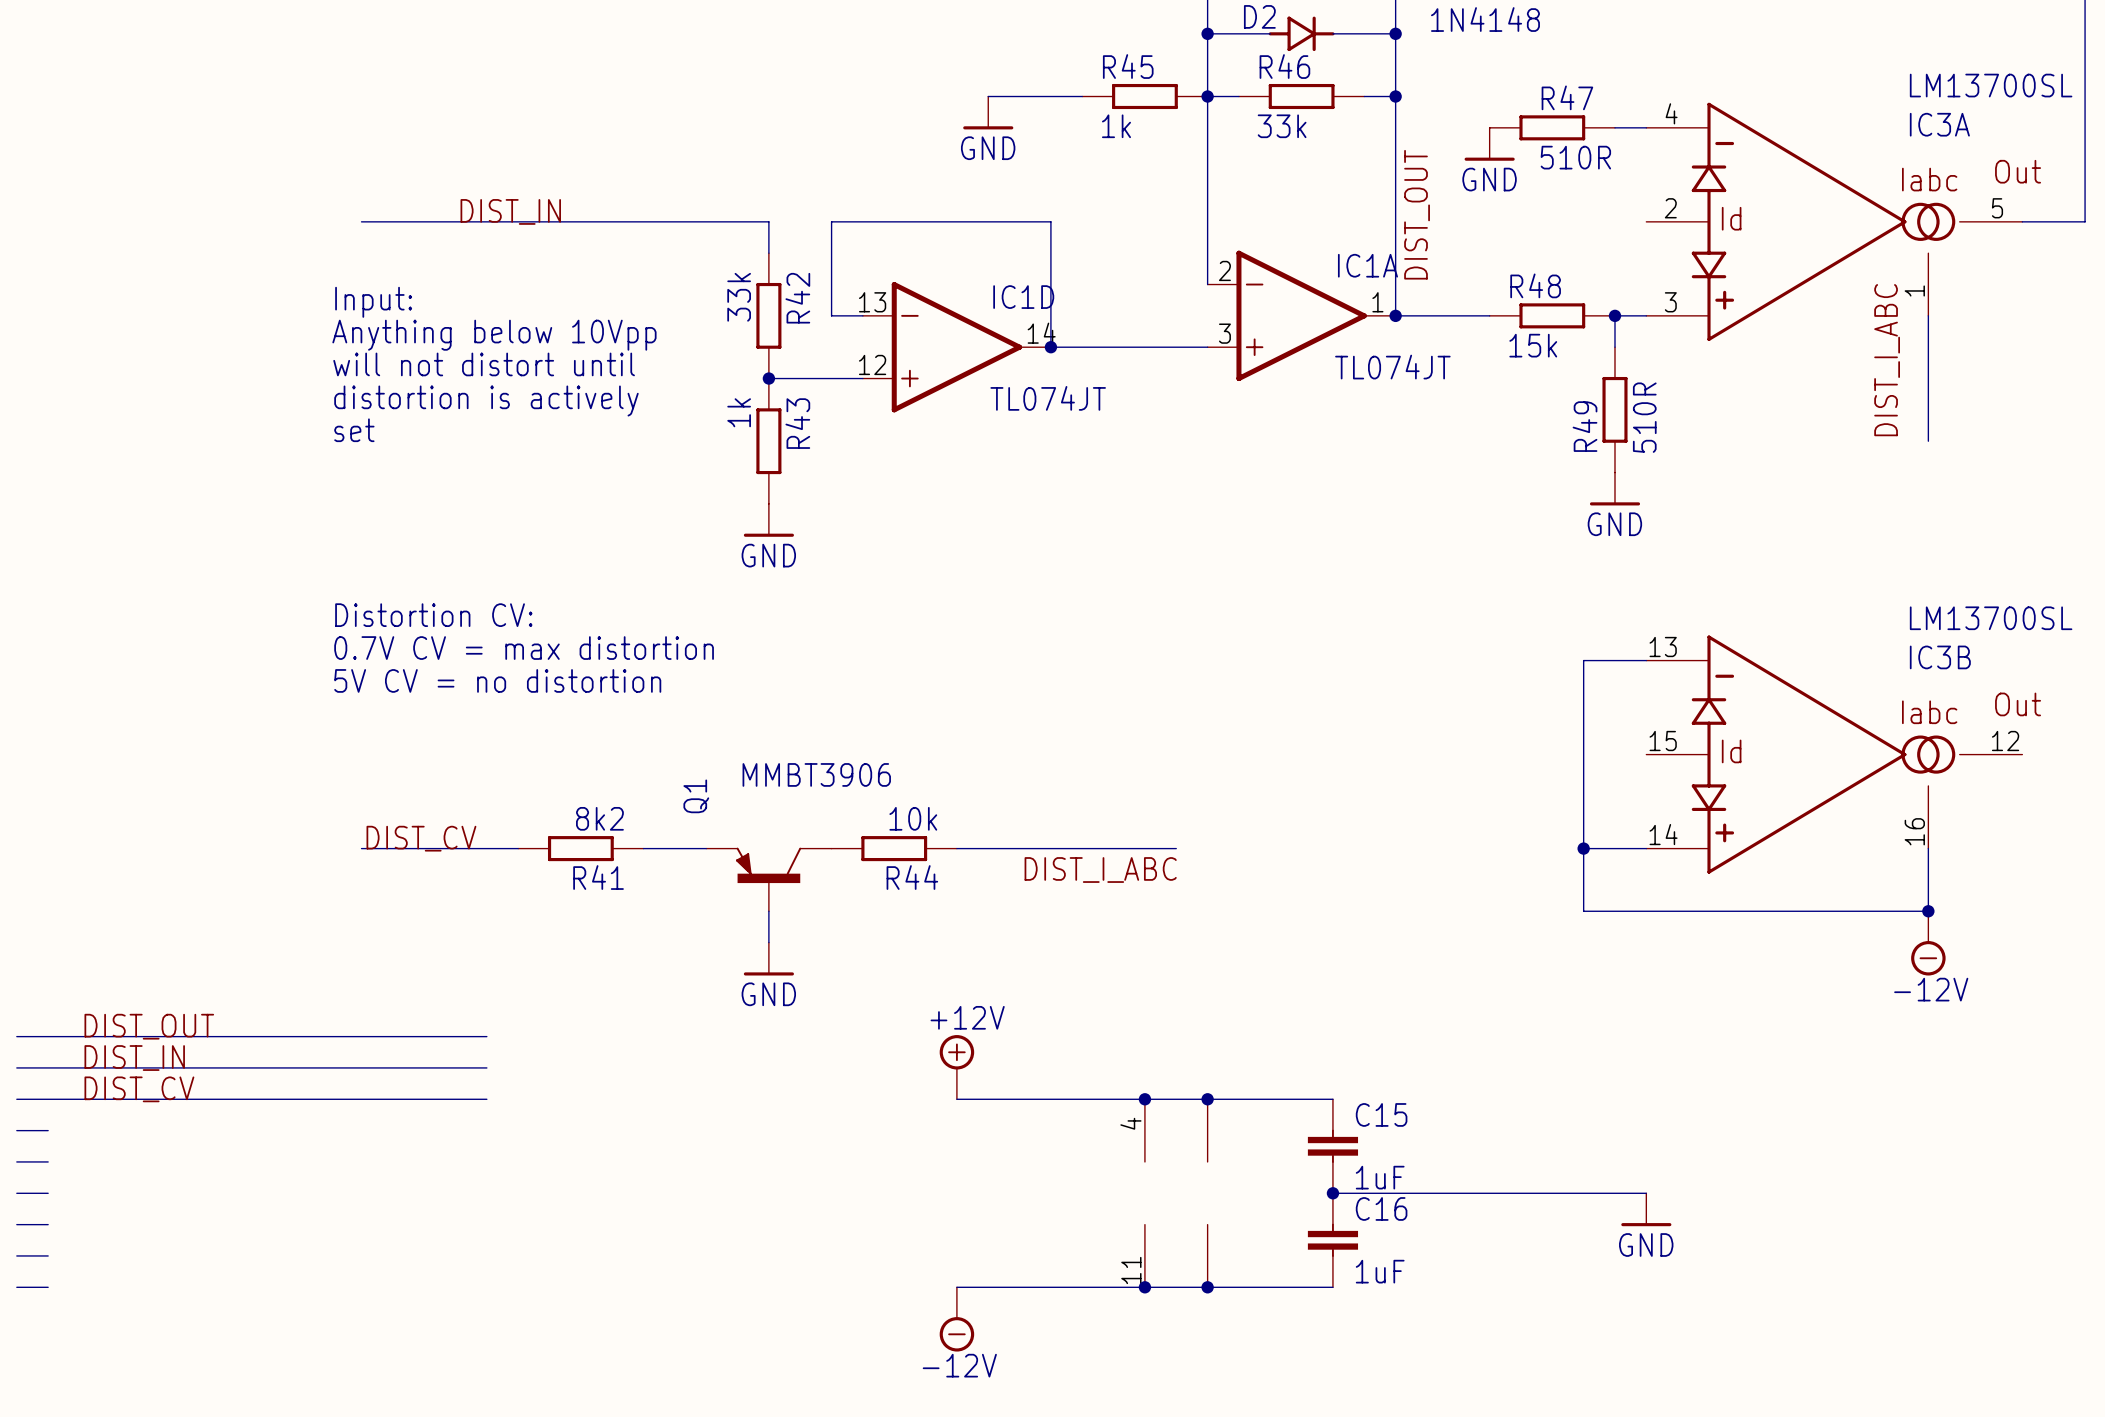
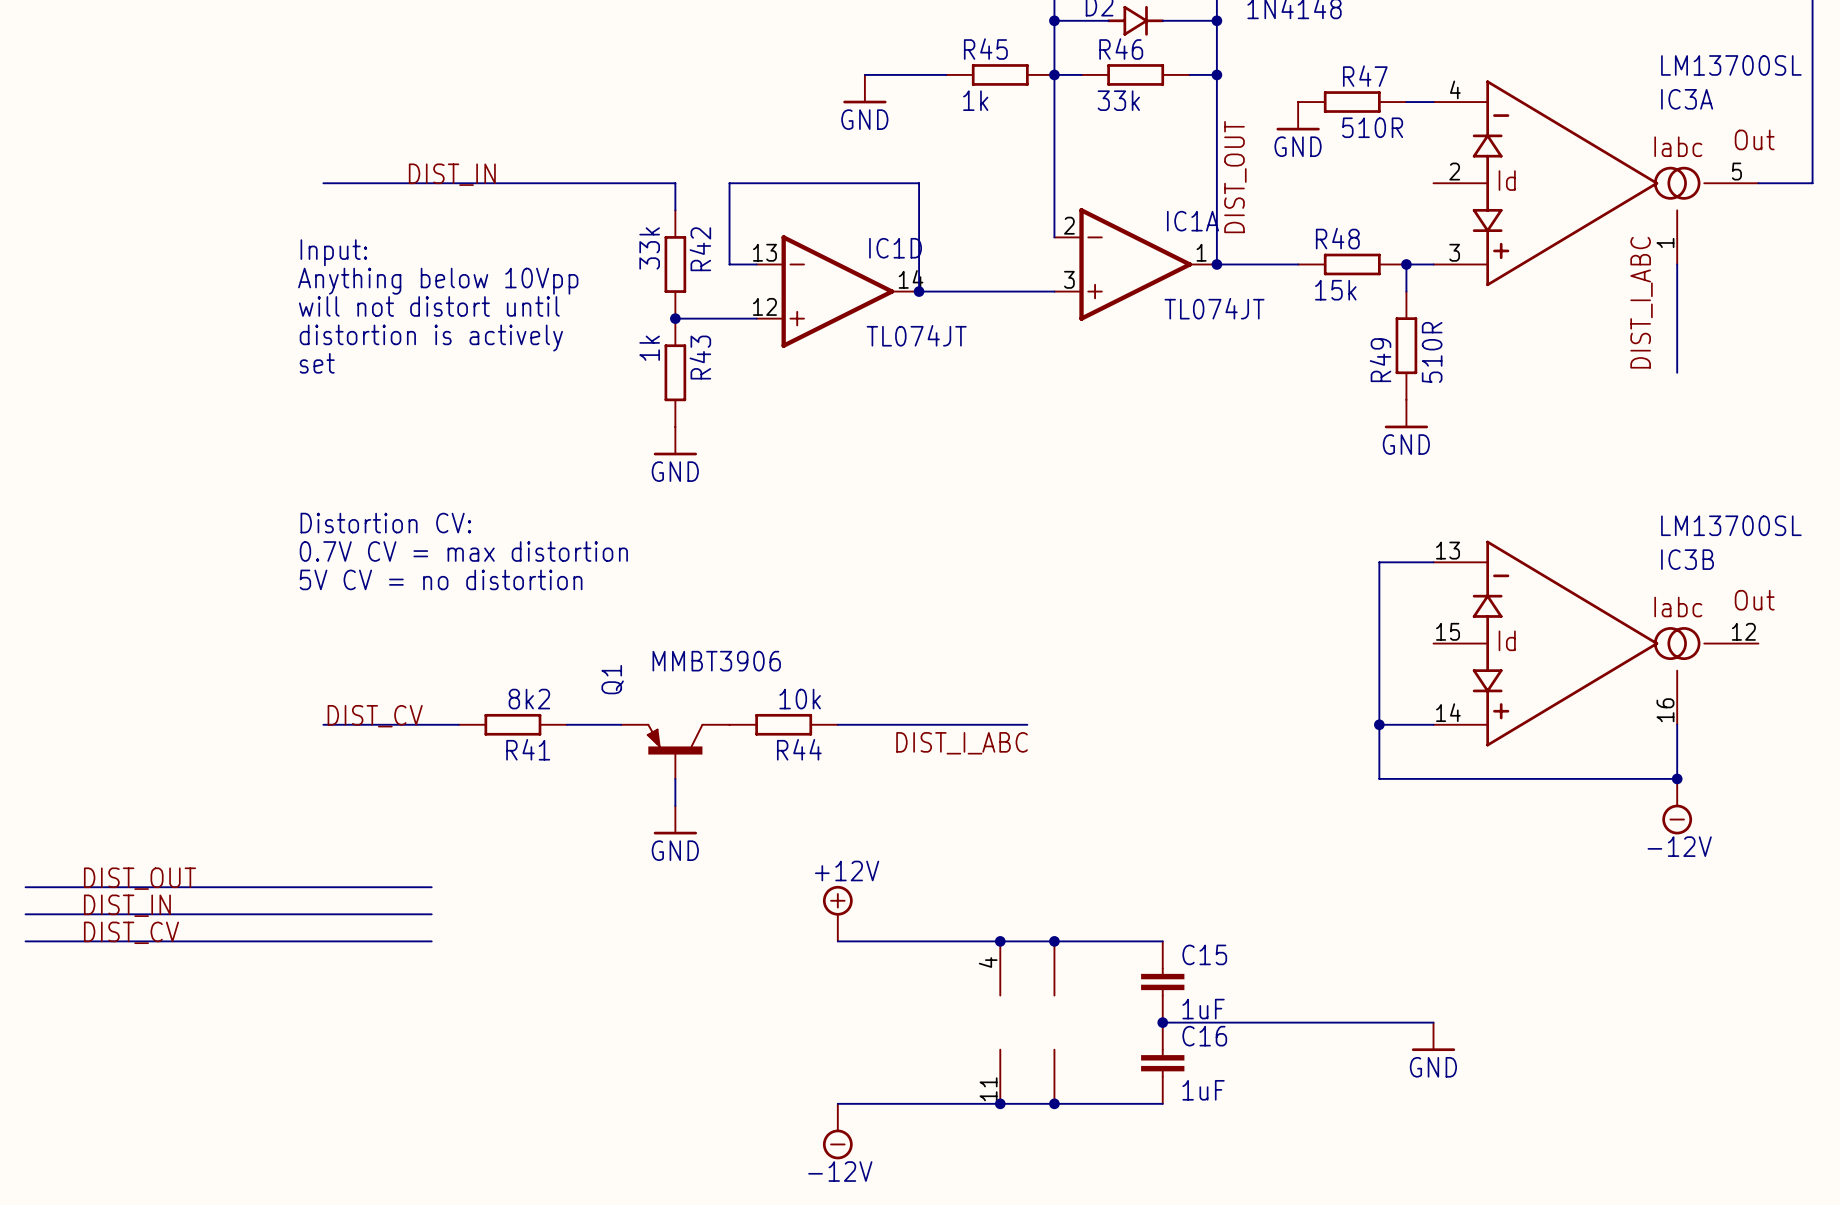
wire: (16, 1130) (48, 1130) -> none
wire: (16, 1161) (48, 1161) -> none
wire: (16, 1193) (48, 1193) -> none
wire: (16, 1224) (48, 1224) -> none
wire: (16, 1255) (48, 1255) -> none
wire: (16, 1287) (48, 1287) -> none

